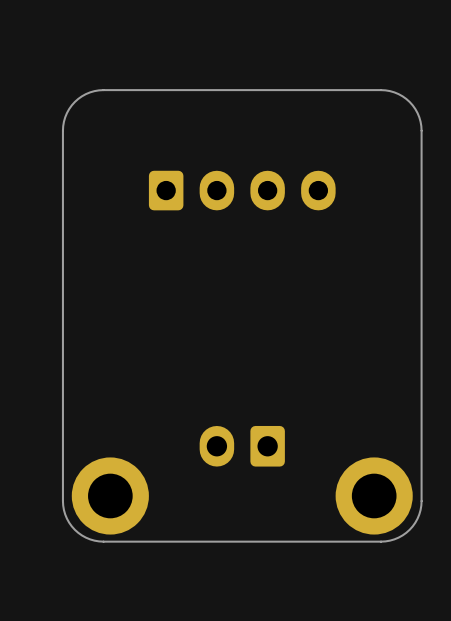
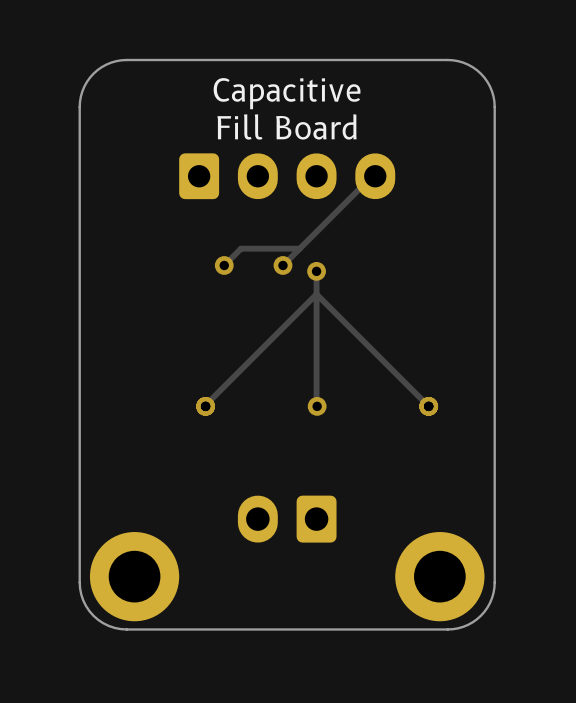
text: none -> Capacitive (287, 93)
text: none -> Fill Board (287, 126)
track: none -> (375, 176) (372, 176) (282, 265)
track: none -> (299, 248) (241, 248) (224, 265)
via: none -> (224, 265)
via: none -> (282, 265)
track: none -> (316, 271) (317, 406)
via: none -> (316, 271)
via: none -> (205, 406)
via: none -> (317, 406)
track: none -> (428, 406) (316, 294) (205, 406)
via: none -> (428, 406)
part position: (242, 446) -> (287, 519)
part position: (110, 495) -> (134, 576)
part position: (374, 495) -> (439, 576)
board edge: (421, 501) (419, 514) (409, 529) (398, 537) (381, 541) (98, 541) (85, 537) (74, 529) (66, 518) (62, 501) -> (494, 535) (494, 587) (490, 602) (480, 615) (472, 622) (463, 626) (447, 629) (126, 629) (114, 627) (98, 619) (89, 611) (83, 600) (79, 582) (79, 535)

